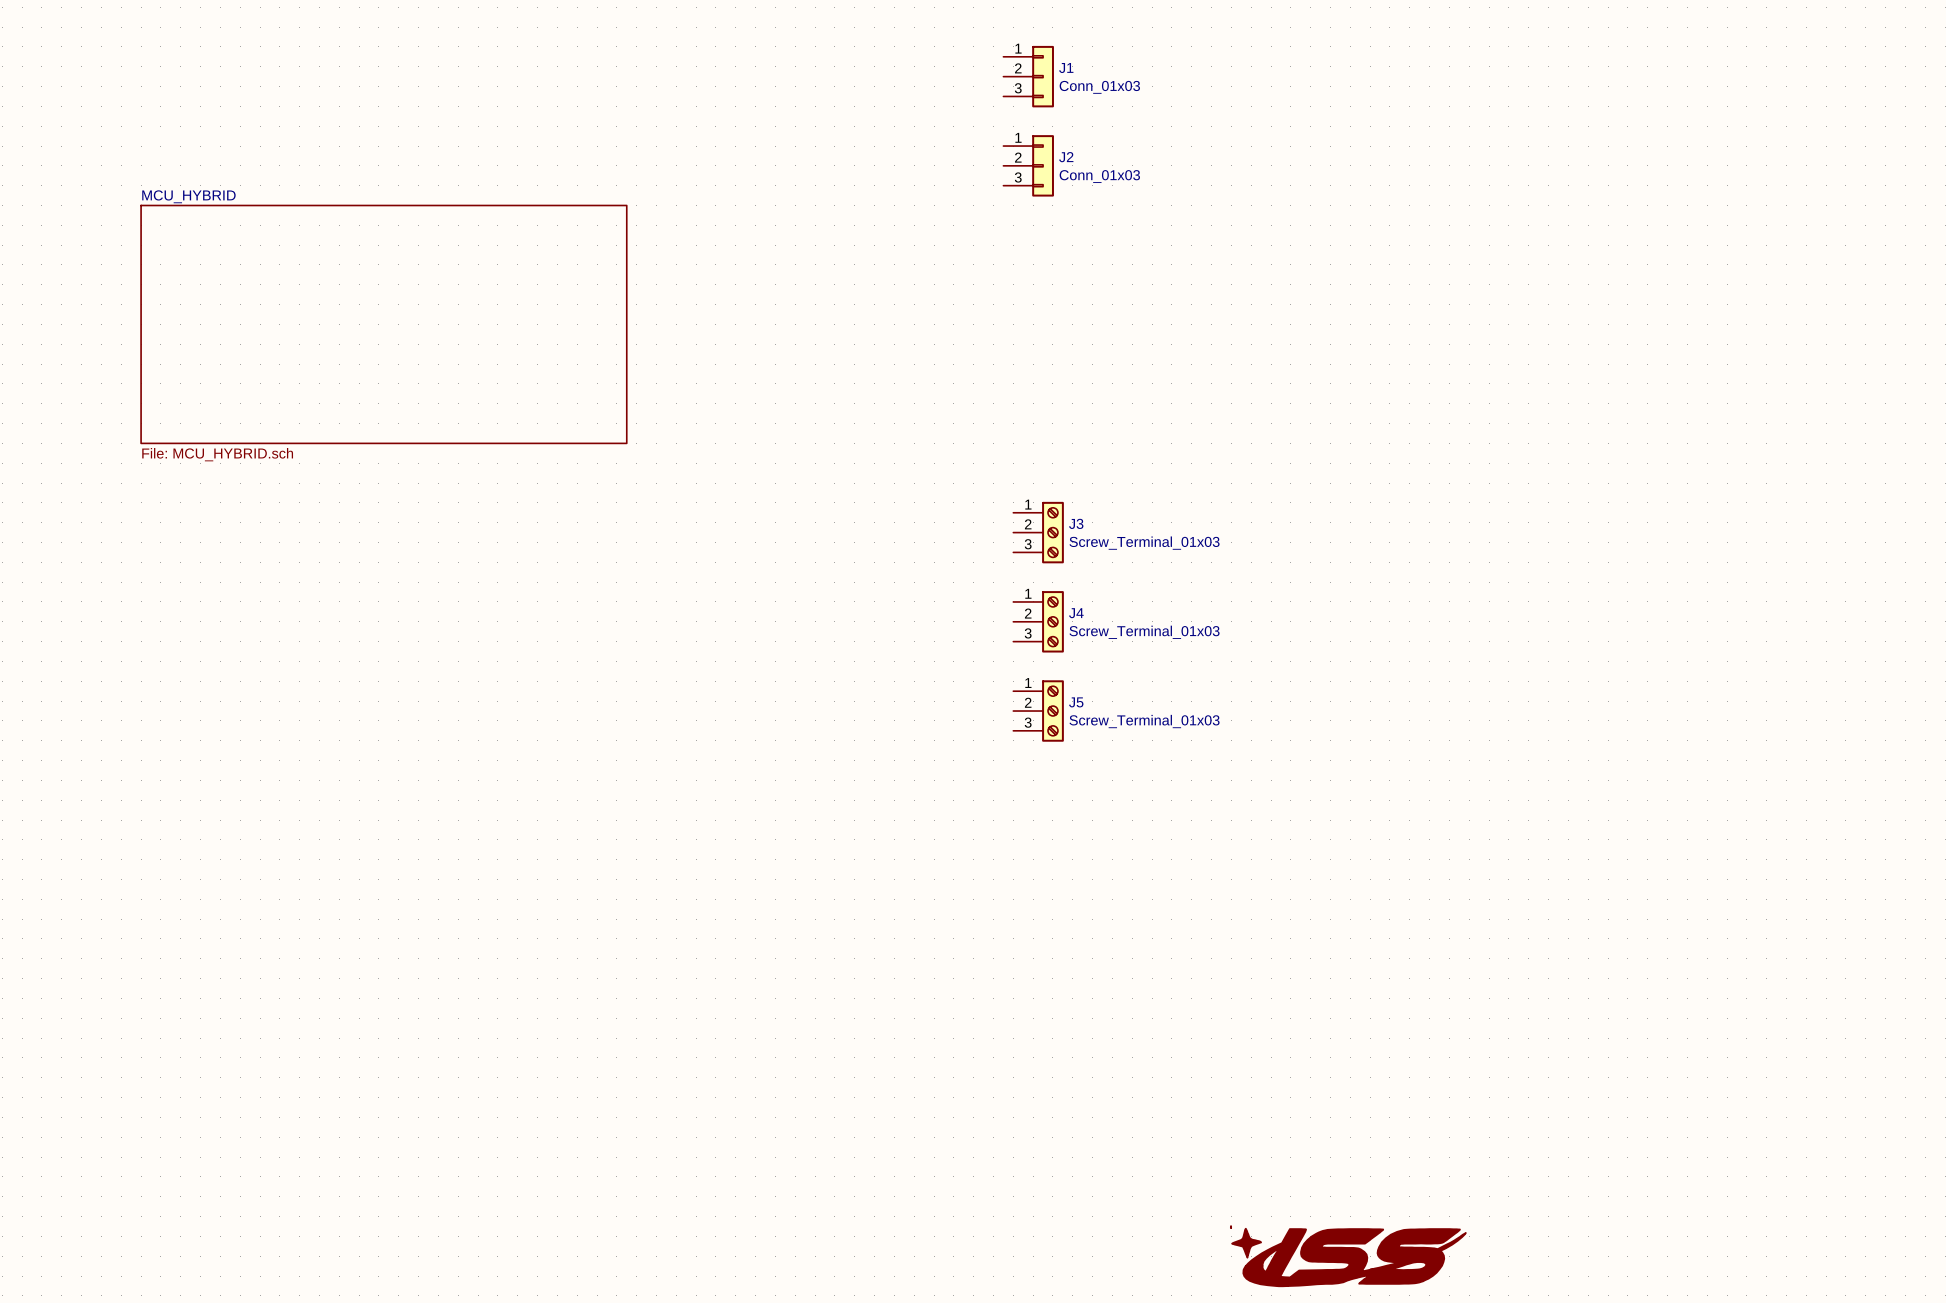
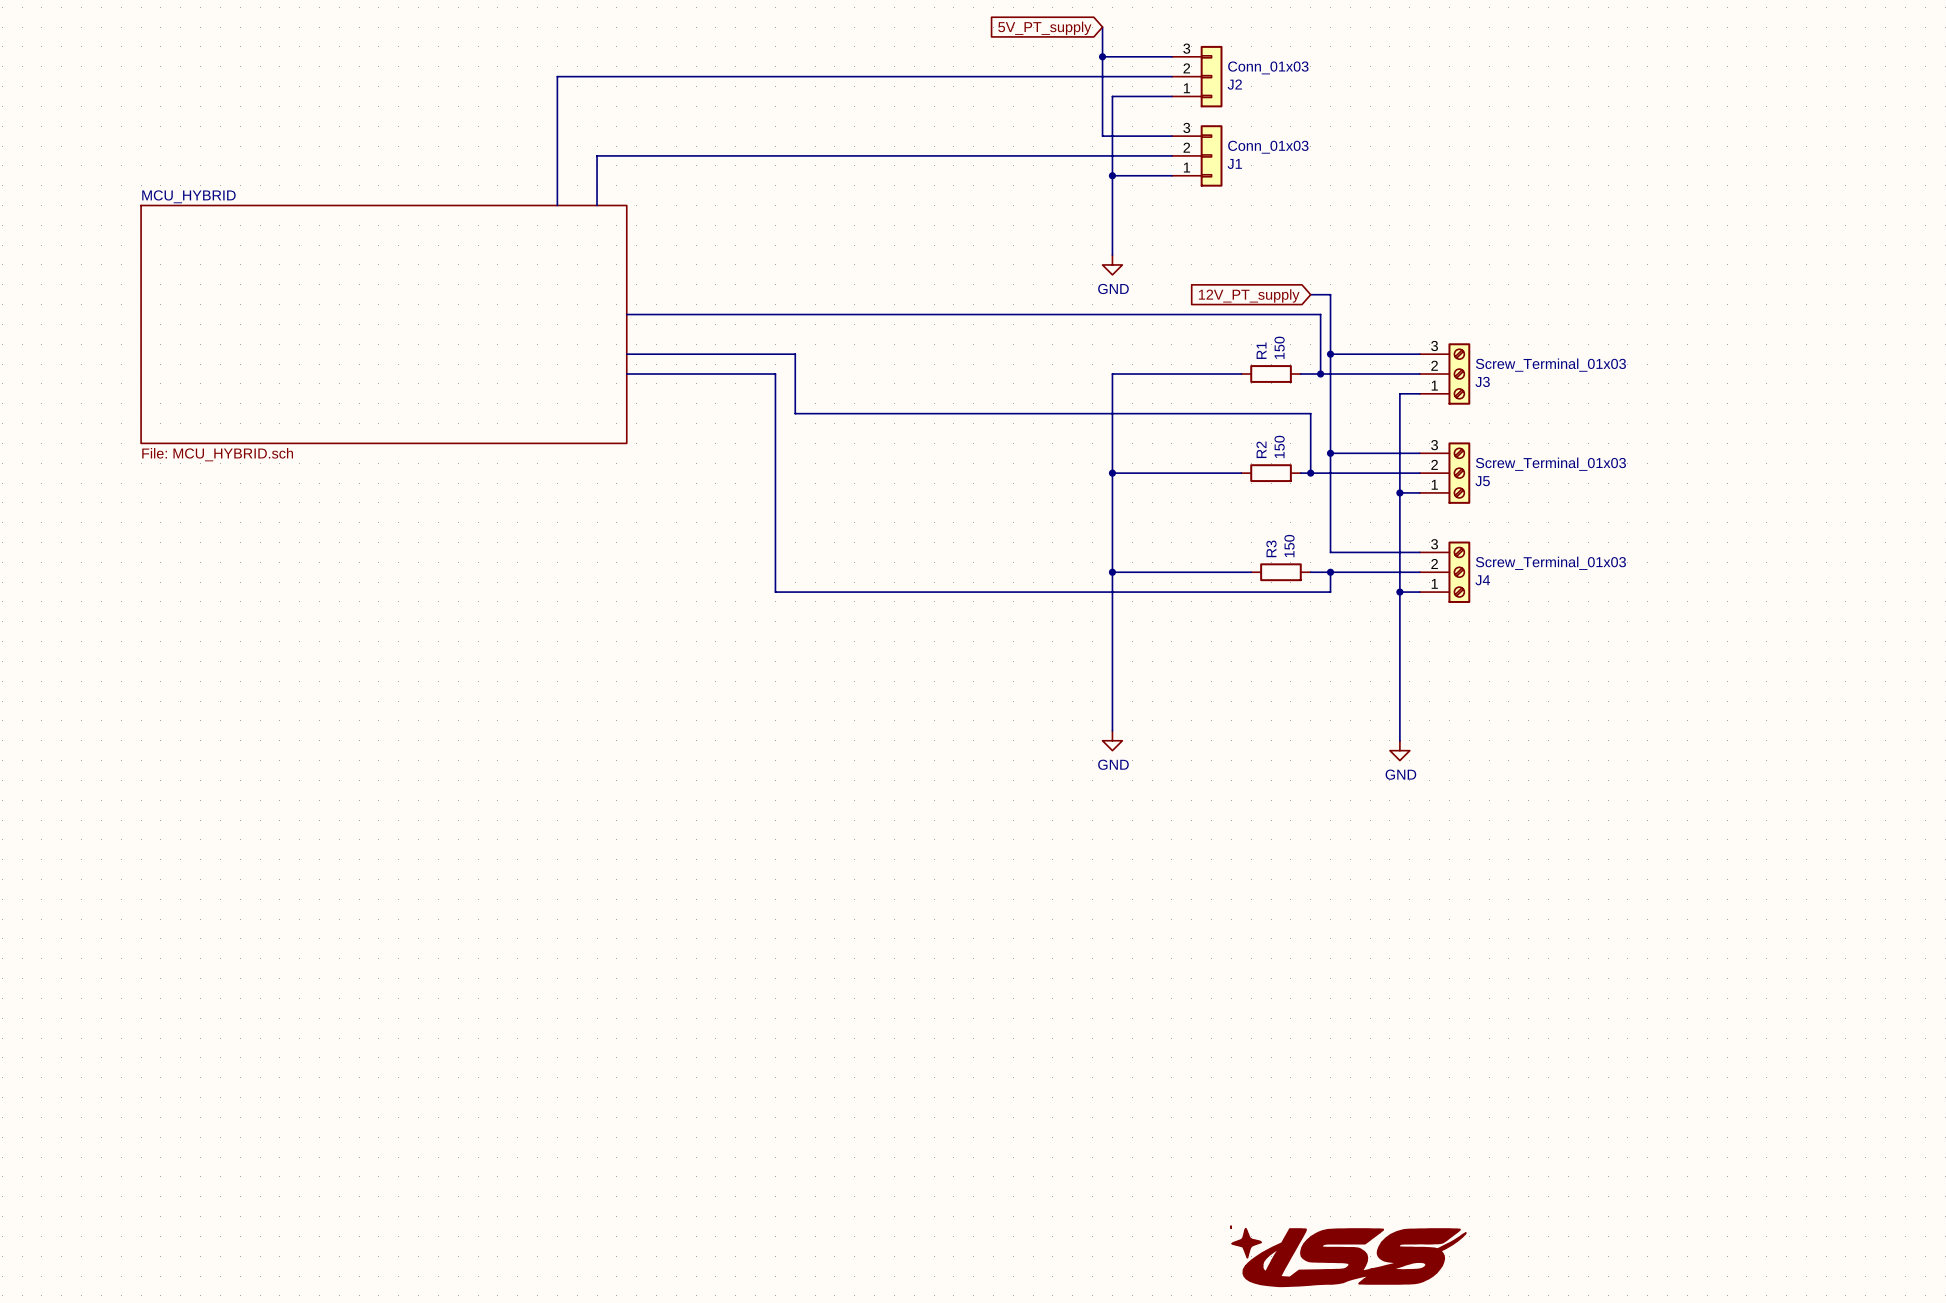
wire: none -> (1102, 27) (1102, 136) (1171, 136)
global label: none -> 5V_PT_supply (1044, 28)
wire: none -> (1102, 56) (1171, 56)
junction: none -> (1102, 56)
J1 position: (1028, 76) -> (1197, 155)
J1 flip: as is (1043, 76) -> up-down (1211, 155)
wire: none -> (1171, 76) (557, 76) (557, 205)
wire: none -> (1171, 96) (1112, 96) (1112, 255)
wire: none -> (1171, 155) (597, 155) (597, 205)
J2 position: (1028, 165) -> (1197, 76)
J2 flip: as is (1043, 165) -> up-down (1211, 76)
wire: none -> (1112, 175) (1171, 175)
junction: none -> (1112, 175)
power symbol: none -> GND (1112, 264)
wire: none -> (1310, 294) (1330, 294) (1330, 552) (1419, 552)
global label: none -> 12V_PT_supply (1249, 295)
wire: none -> (626, 314) (1320, 314) (1320, 374)
wire: none -> (626, 354) (795, 354) (795, 413) (1310, 413) (1310, 473)
wire: none -> (1330, 354) (1419, 354)
junction: none -> (1330, 354)
wire: none -> (626, 374) (775, 374) (775, 592) (1330, 592) (1330, 572)
wire: none -> (1241, 374) (1112, 374) (1112, 730)
R1: none -> 150 (1271, 374)
wire: none -> (1300, 374) (1419, 374)
junction: none -> (1320, 374)
wire: none -> (1419, 393) (1399, 393) (1399, 740)
wire: none -> (1330, 453) (1419, 453)
junction: none -> (1330, 453)
wire: none -> (1112, 473) (1241, 473)
junction: none -> (1112, 473)
R2: none -> 150 (1271, 473)
wire: none -> (1300, 473) (1419, 473)
junction: none -> (1310, 473)
wire: none -> (1399, 492) (1419, 492)
junction: none -> (1399, 492)
J3 position: (1038, 532) -> (1445, 374)
J3 flip: as is (1052, 532) -> up-down (1459, 374)
wire: none -> (1112, 572) (1251, 572)
junction: none -> (1112, 572)
R3: none -> 150 (1280, 572)
wire: none -> (1310, 572) (1419, 572)
junction: none -> (1330, 572)
wire: none -> (1399, 592) (1419, 592)
junction: none -> (1399, 592)
J4 position: (1038, 621) -> (1445, 572)
J4 flip: as is (1052, 621) -> up-down (1459, 572)
J5 position: (1038, 711) -> (1445, 473)
J5 flip: as is (1052, 711) -> up-down (1459, 473)
power symbol: none -> GND (1112, 740)
power symbol: none -> GND (1399, 750)

